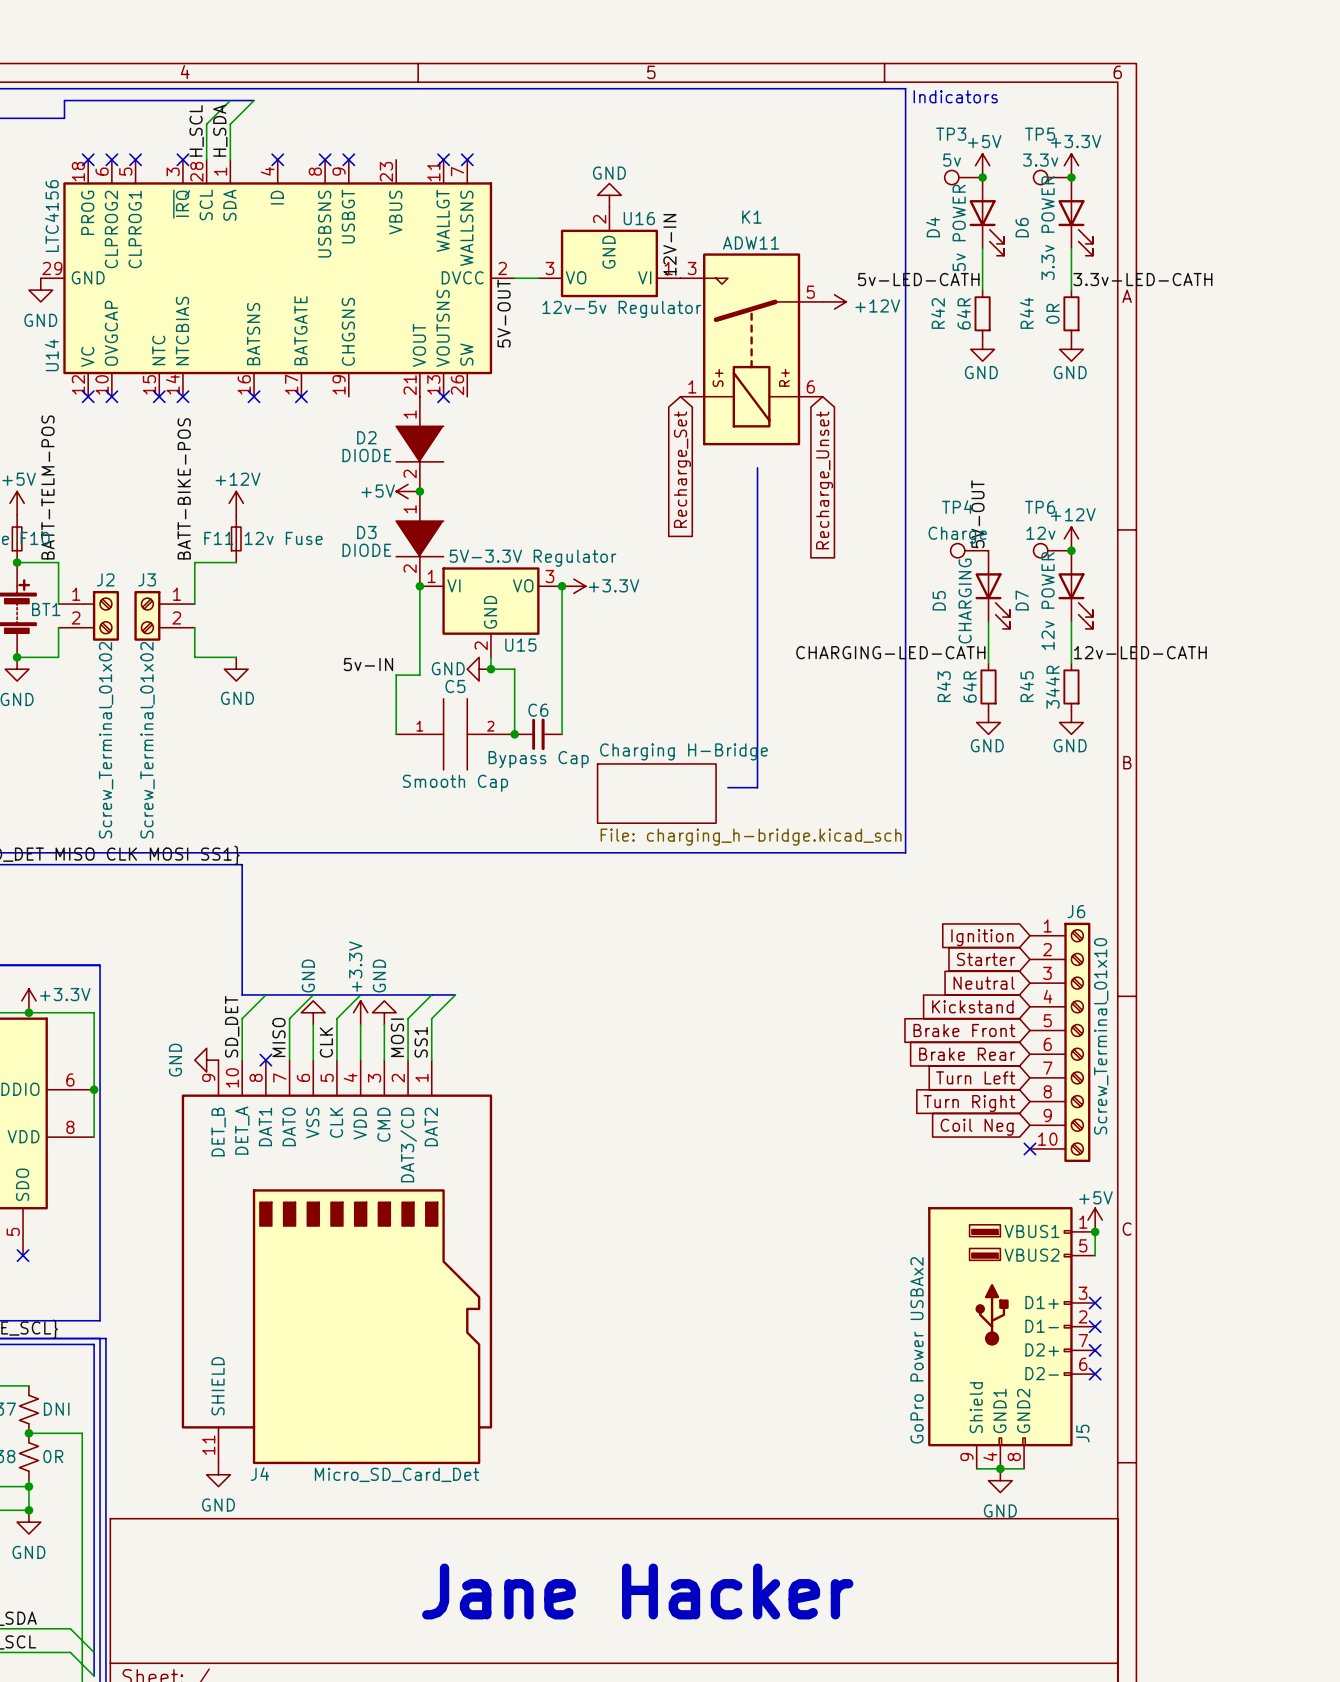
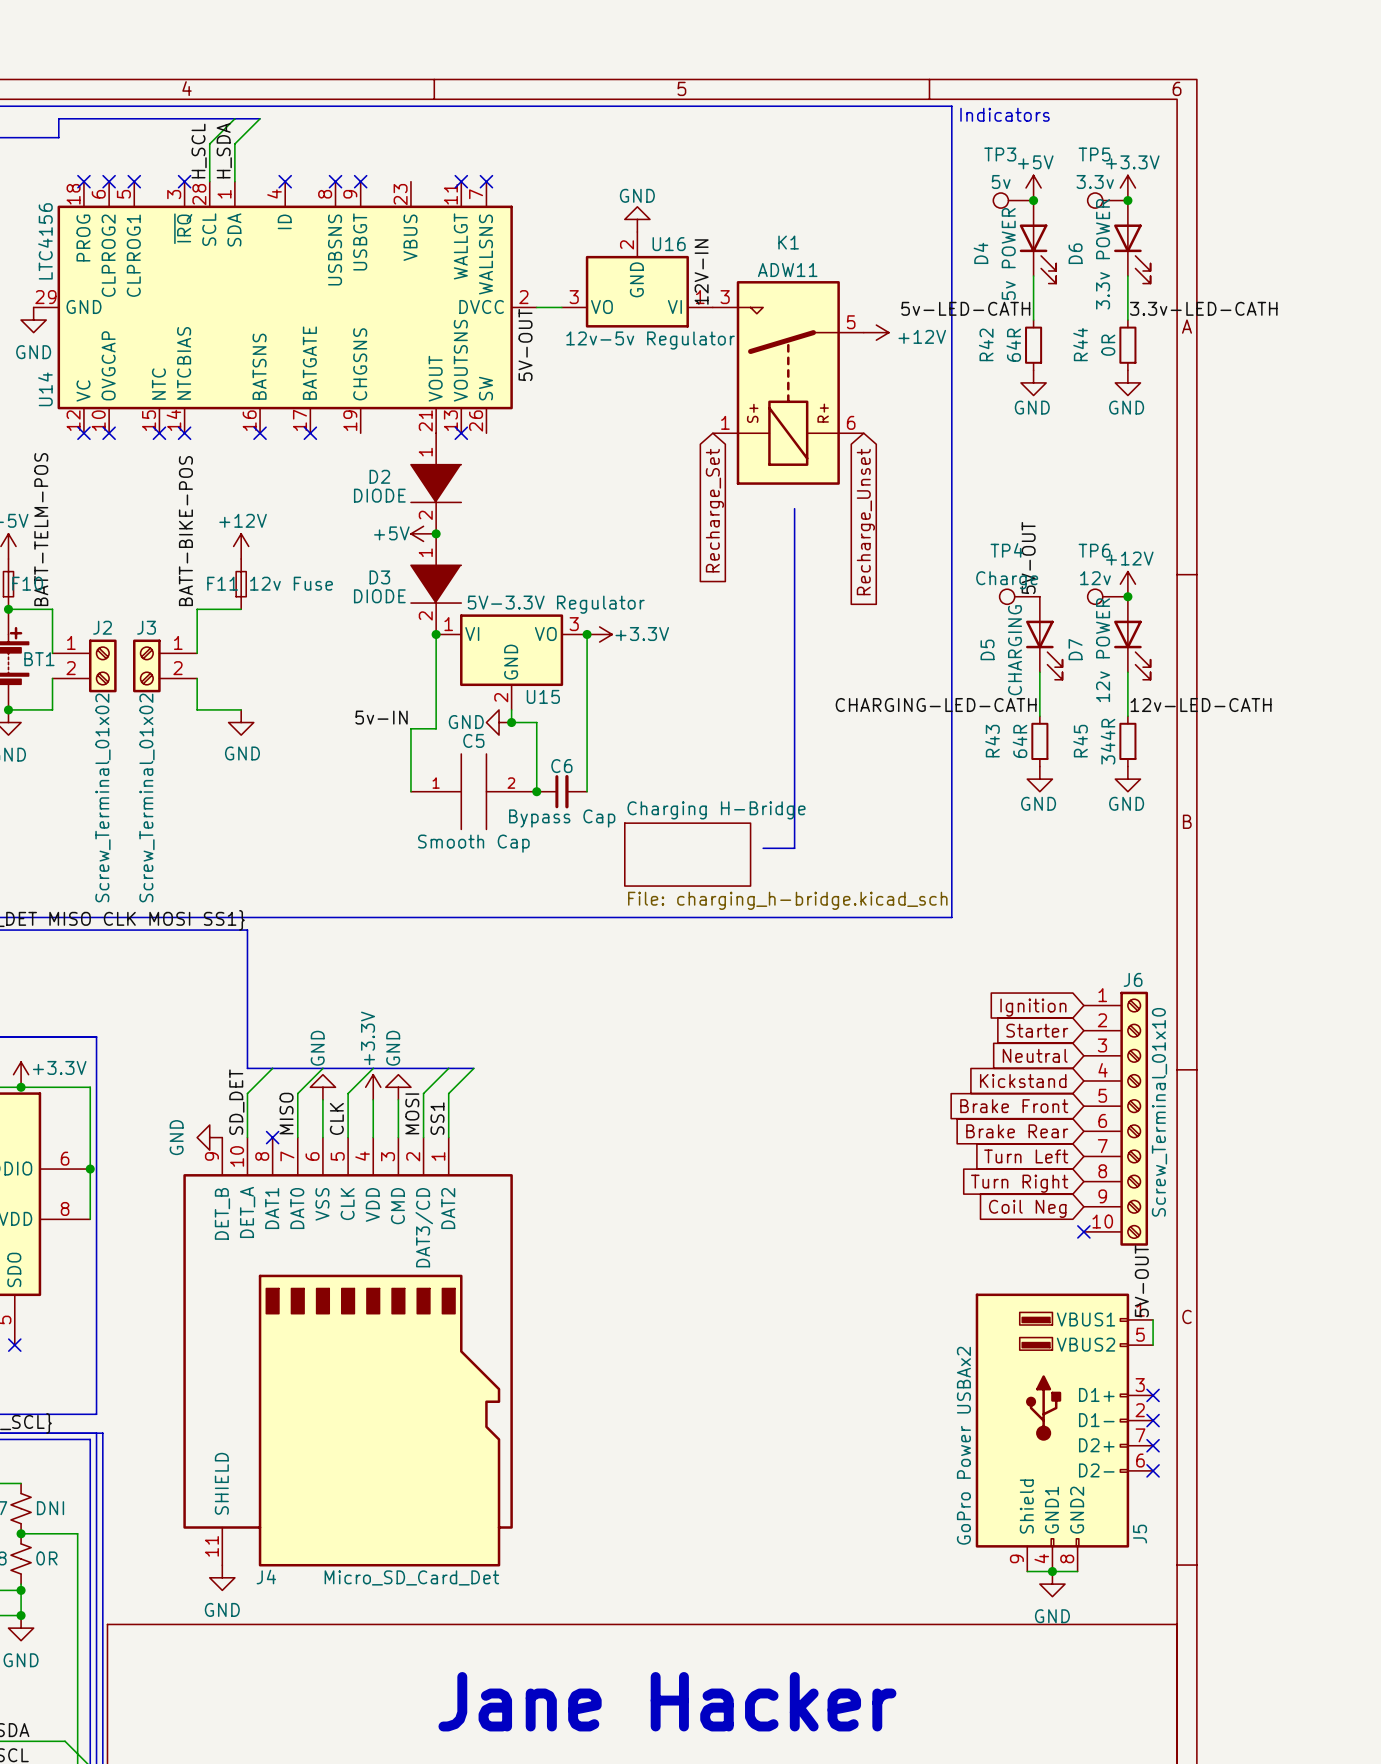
label: none -> 5V-OUT (1141, 1281)
power symbol: +5V (1095, 1220) -> none
junction: (1095, 1231) -> none

